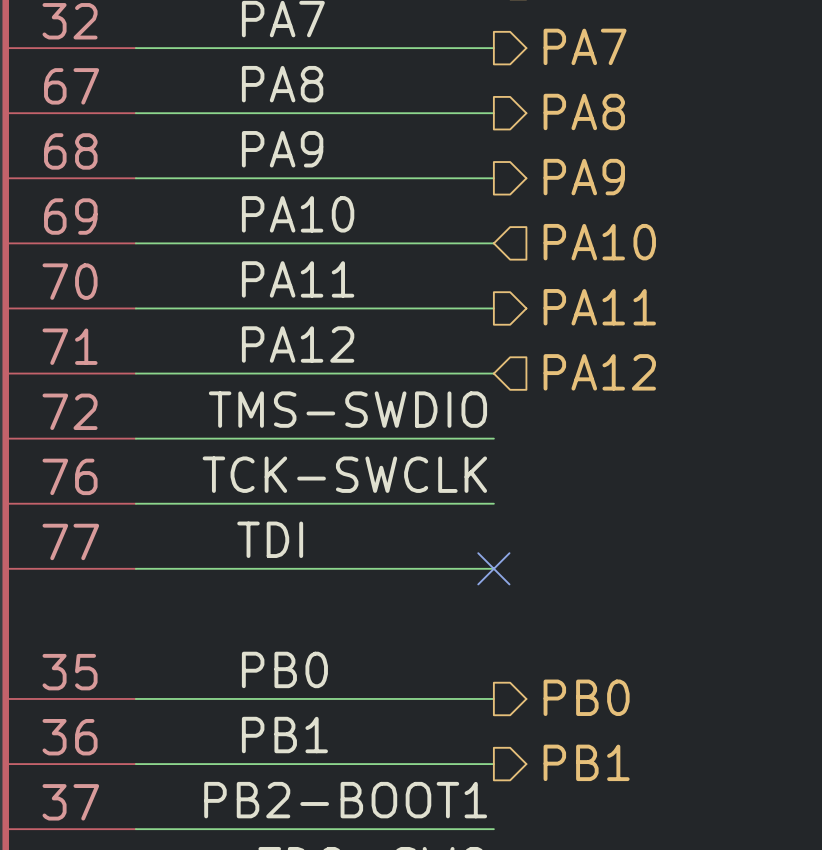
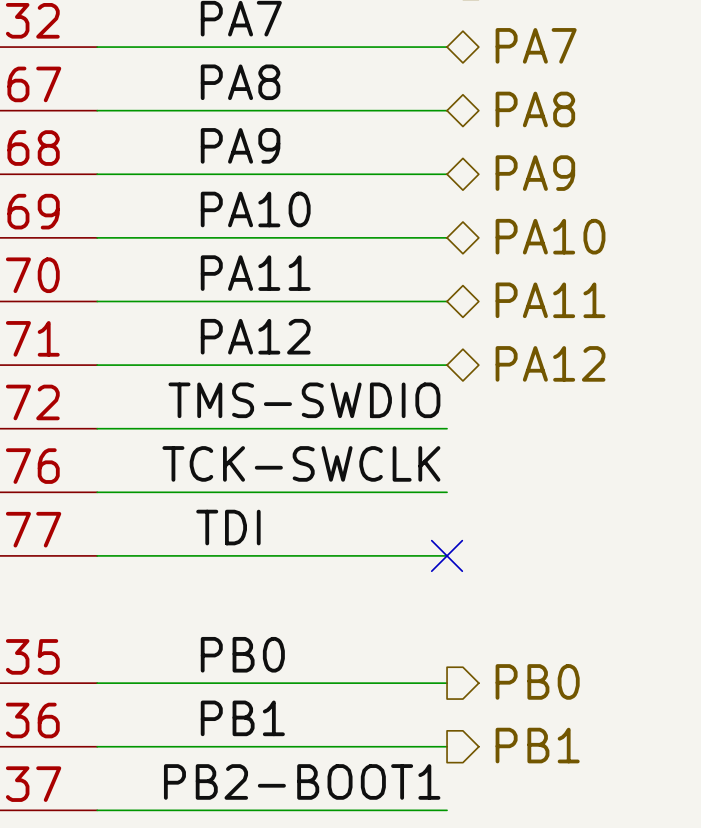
hierarchical label shape: output (585, 46) -> bidirectional (536, 45)
hierarchical label shape: output (584, 111) -> bidirectional (535, 109)
hierarchical label shape: output (584, 177) -> bidirectional (535, 173)
hierarchical label shape: input (599, 242) -> bidirectional (550, 236)
hierarchical label shape: output (599, 307) -> bidirectional (550, 300)
hierarchical label shape: input (599, 372) -> bidirectional (550, 363)

